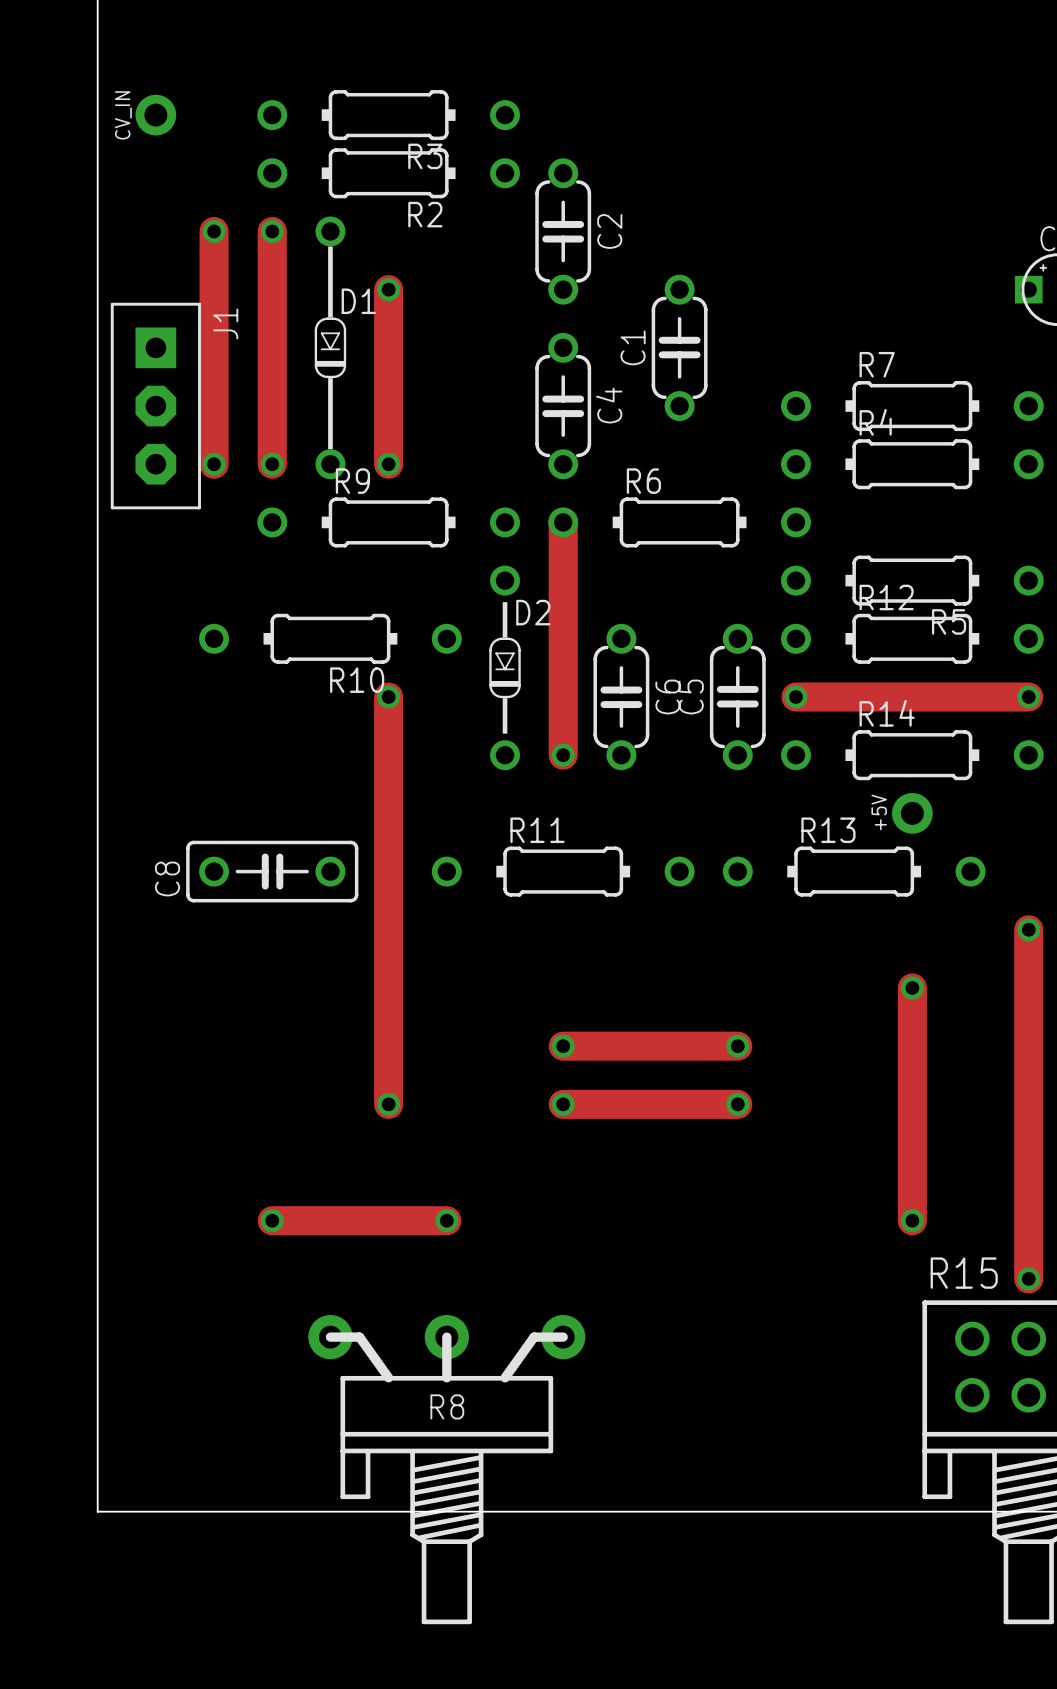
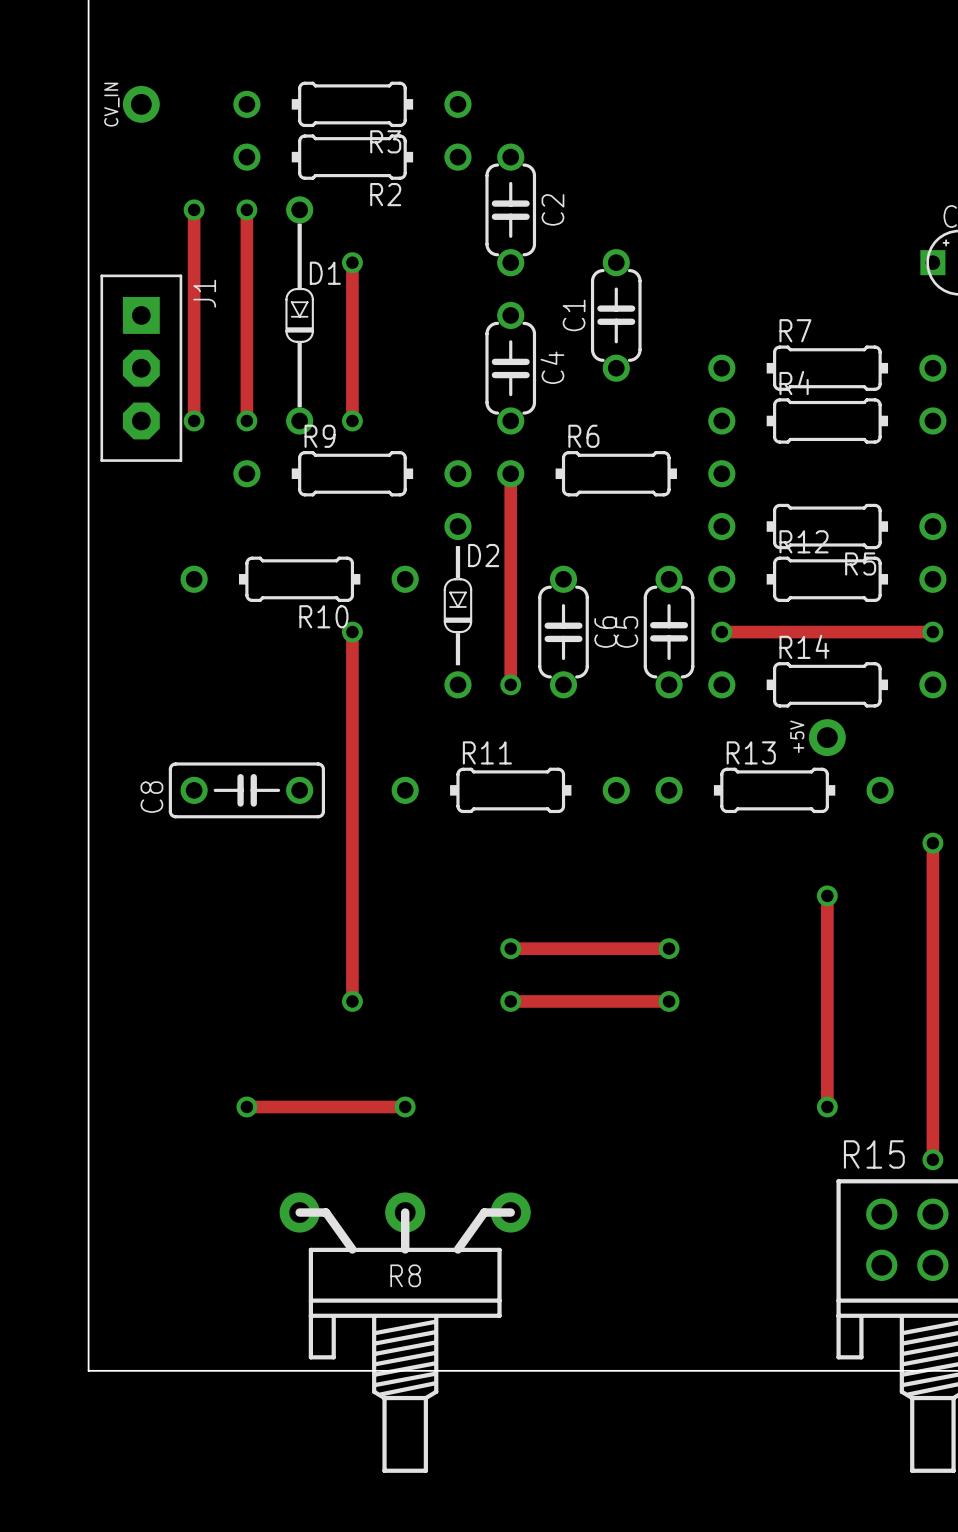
track width: thick (214, 231) (214, 464) -> thin (194, 209) (194, 420)
track width: thick (272, 231) (272, 464) -> thin (246, 209) (246, 420)
track width: thick (388, 289) (388, 464) -> thin (352, 262) (352, 420)
track width: thick (563, 522) (563, 755) -> thin (510, 473) (510, 684)
track width: thick (388, 697) (388, 1104) -> thin (352, 632) (352, 1001)
track width: thick (795, 697) (1028, 697) -> thin (721, 632) (932, 632)
track width: thick (1028, 929) (1028, 1278) -> thin (932, 843) (932, 1159)
track width: thick (912, 987) (912, 1220) -> thin (827, 895) (827, 1106)
track width: thick (563, 1046) (737, 1046) -> thin (510, 948) (669, 948)
track width: thick (563, 1104) (737, 1104) -> thin (510, 1001) (669, 1001)
track width: thick (272, 1220) (446, 1220) -> thin (246, 1106) (405, 1106)

